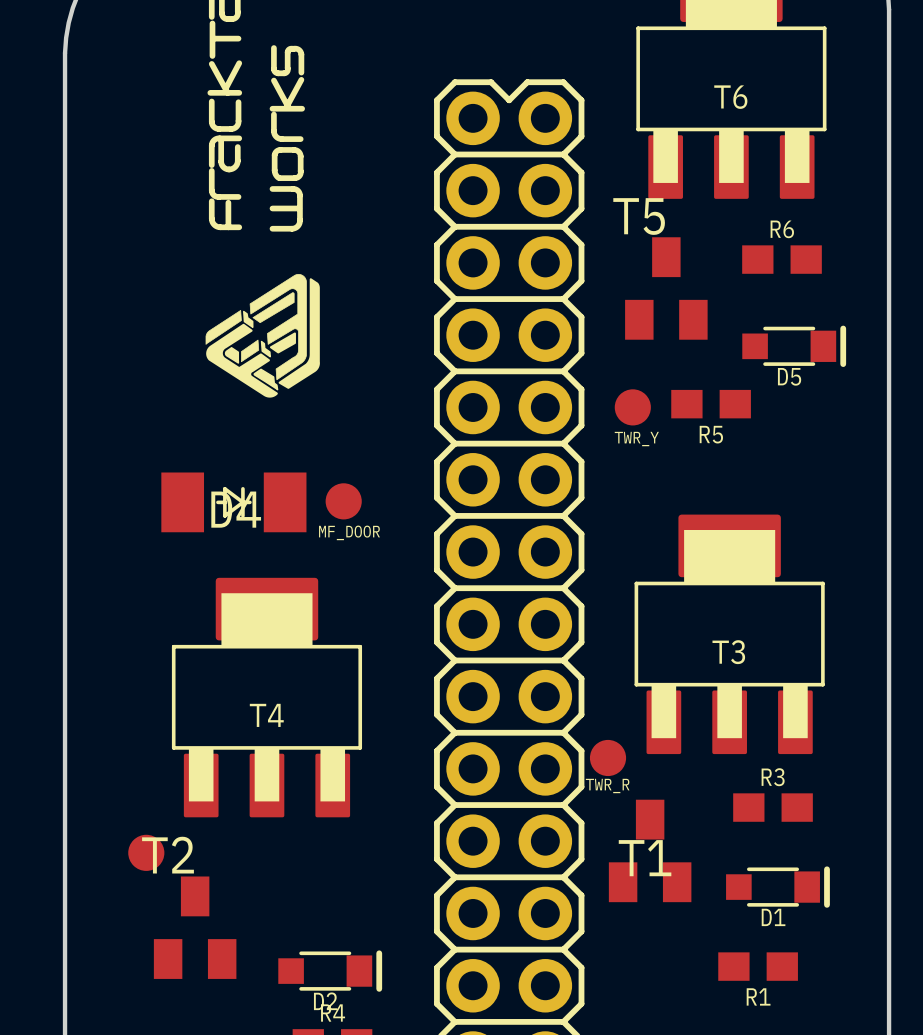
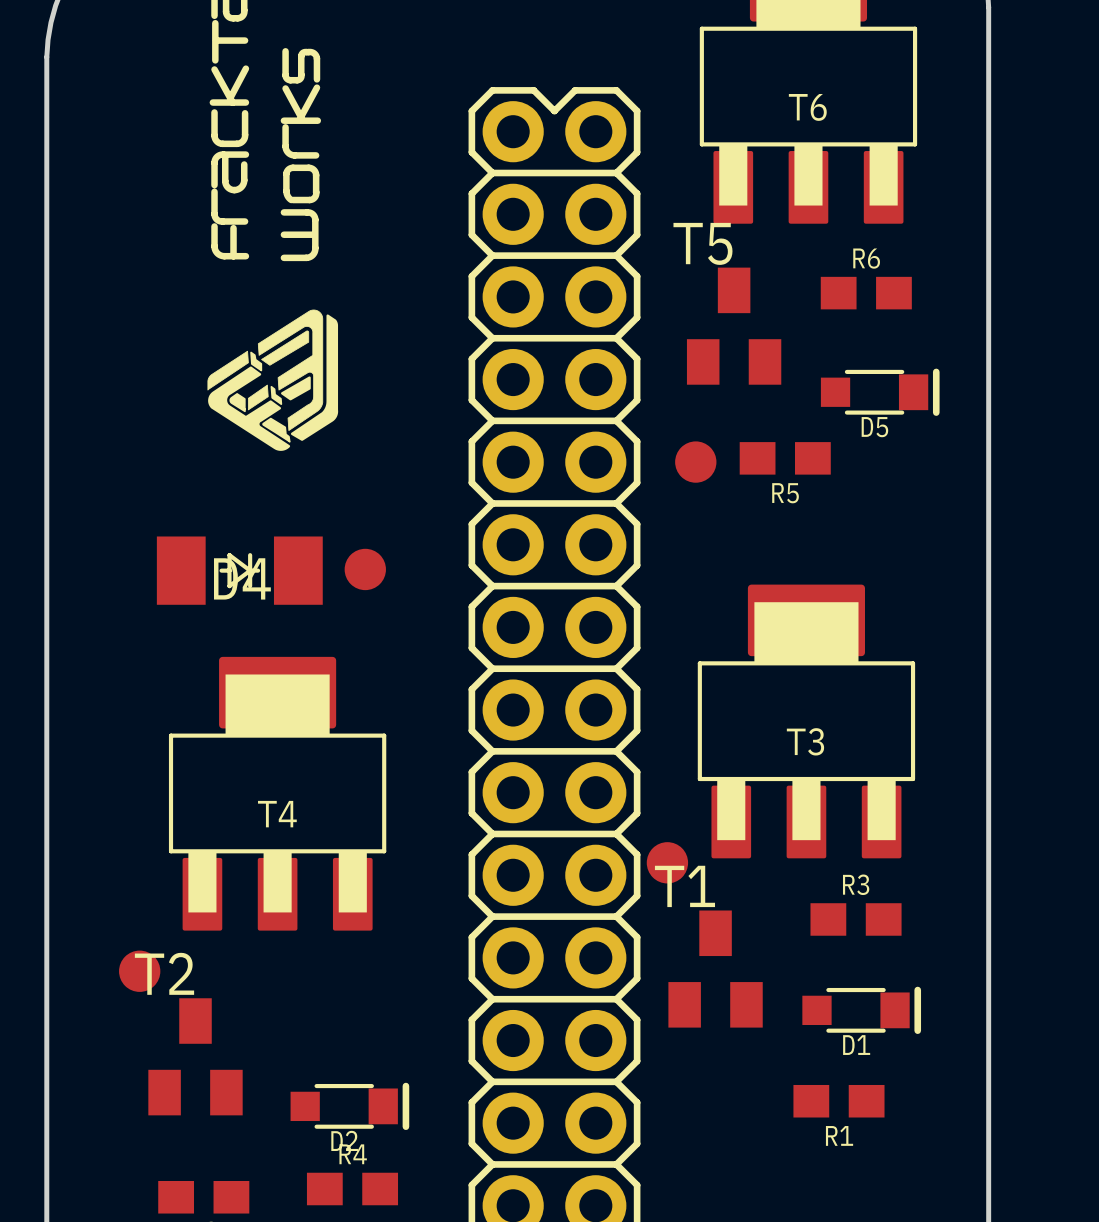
text: TWR_Y (636, 439) -> none
text: MF_DOOR (349, 532) -> none
text: TWR_R (607, 785) -> none
T1 name position: T1 (645, 858) -> T1 (684, 886)

